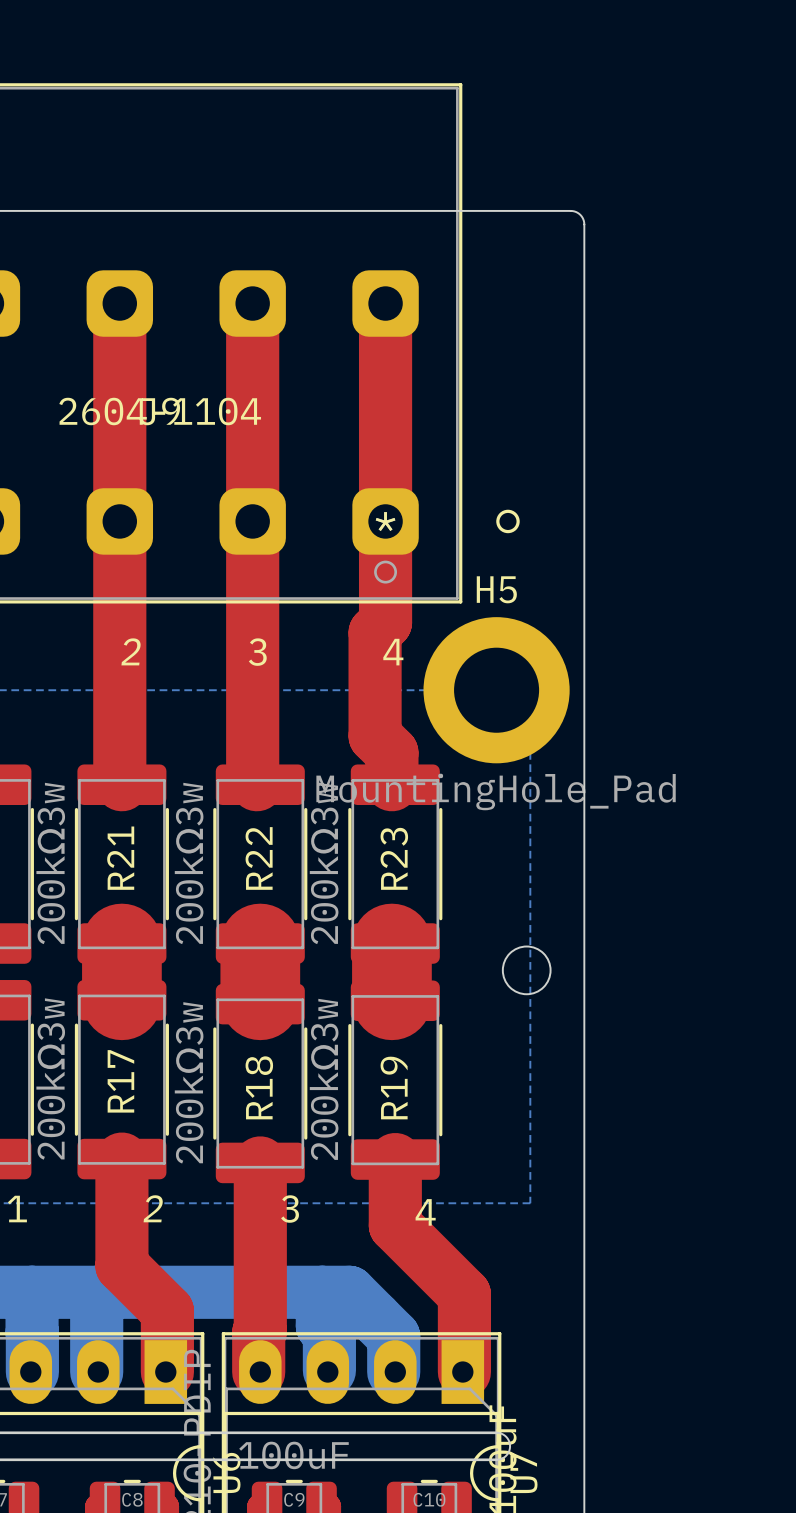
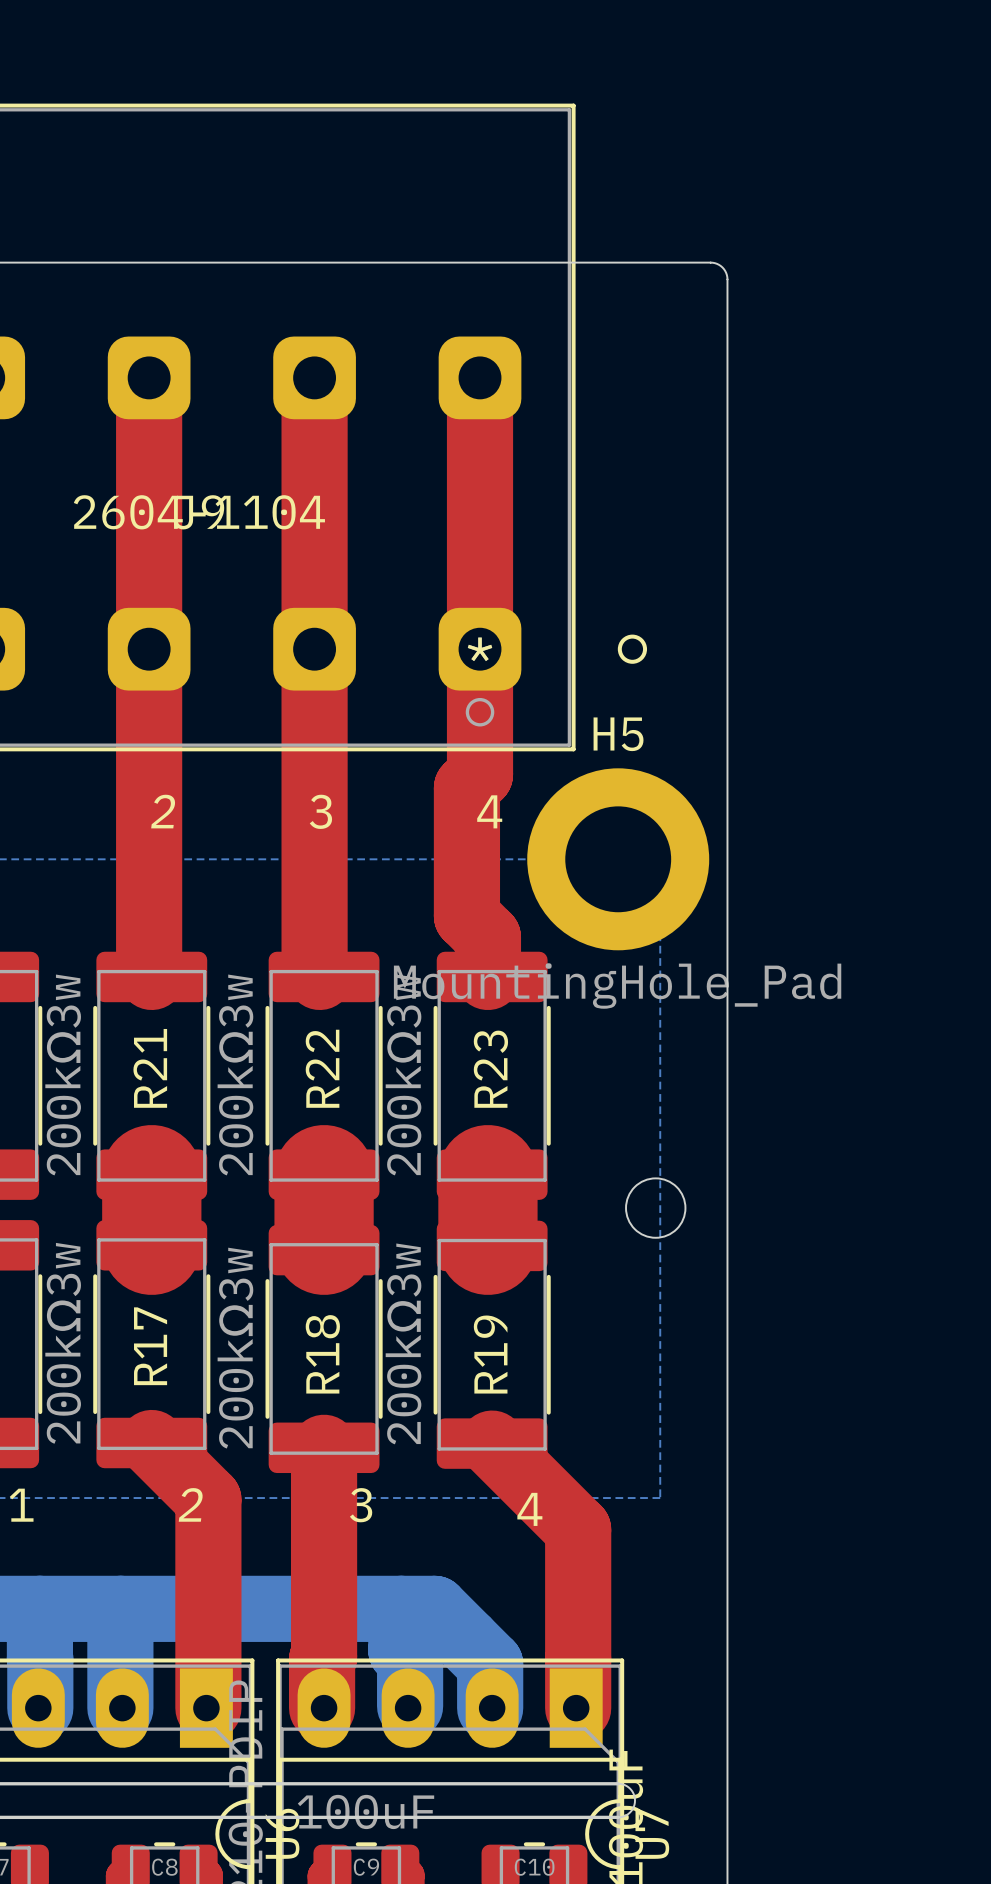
top track: (121, 1159) (121, 1265) (167, 1311) -> (151, 1442) (208, 1499) (208, 1632)
top track: (395, 1159) (395, 1225) (464, 1294) -> (492, 1443) (578, 1529) (578, 1611)

